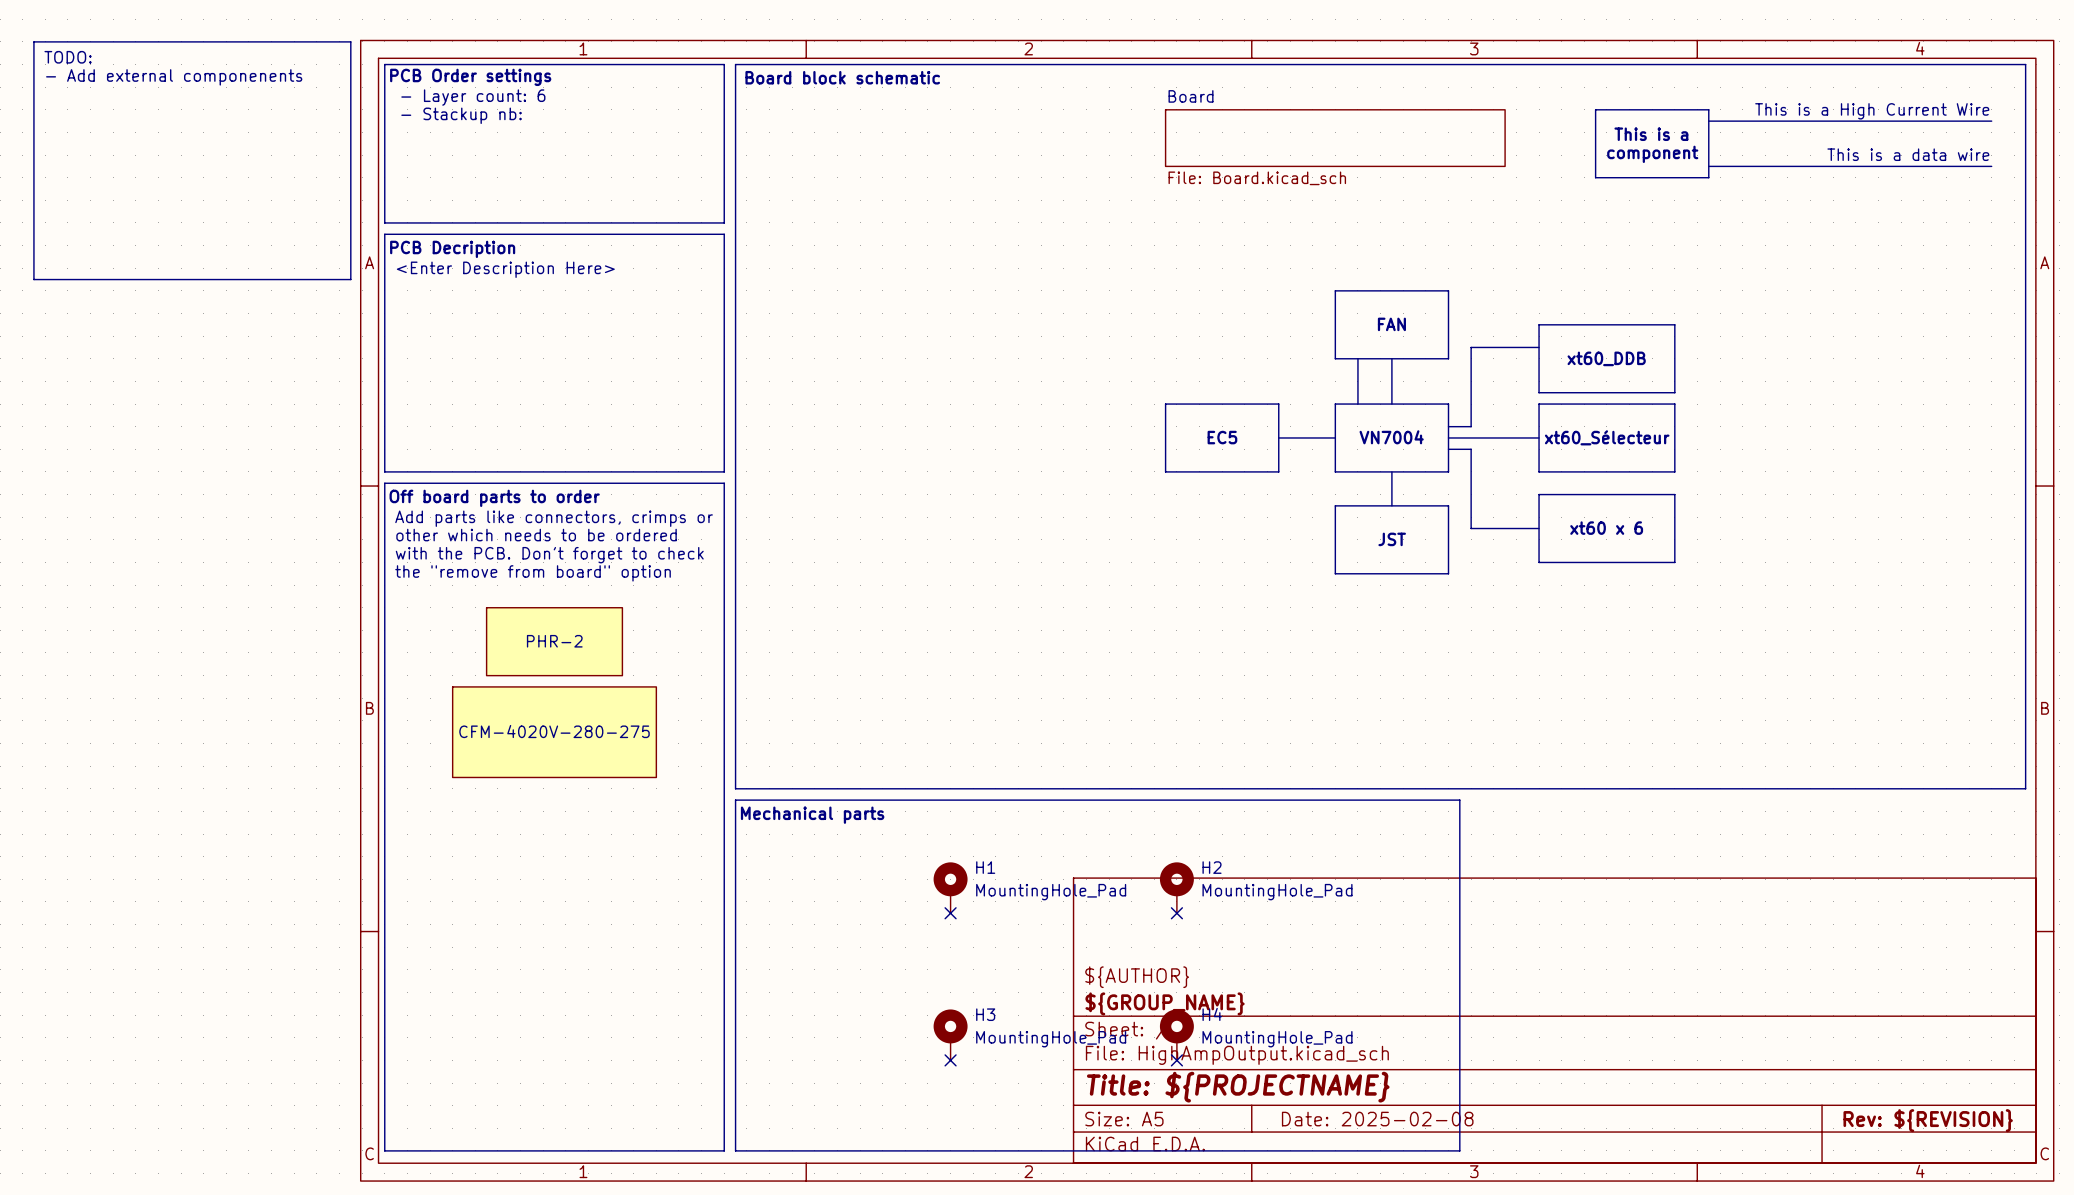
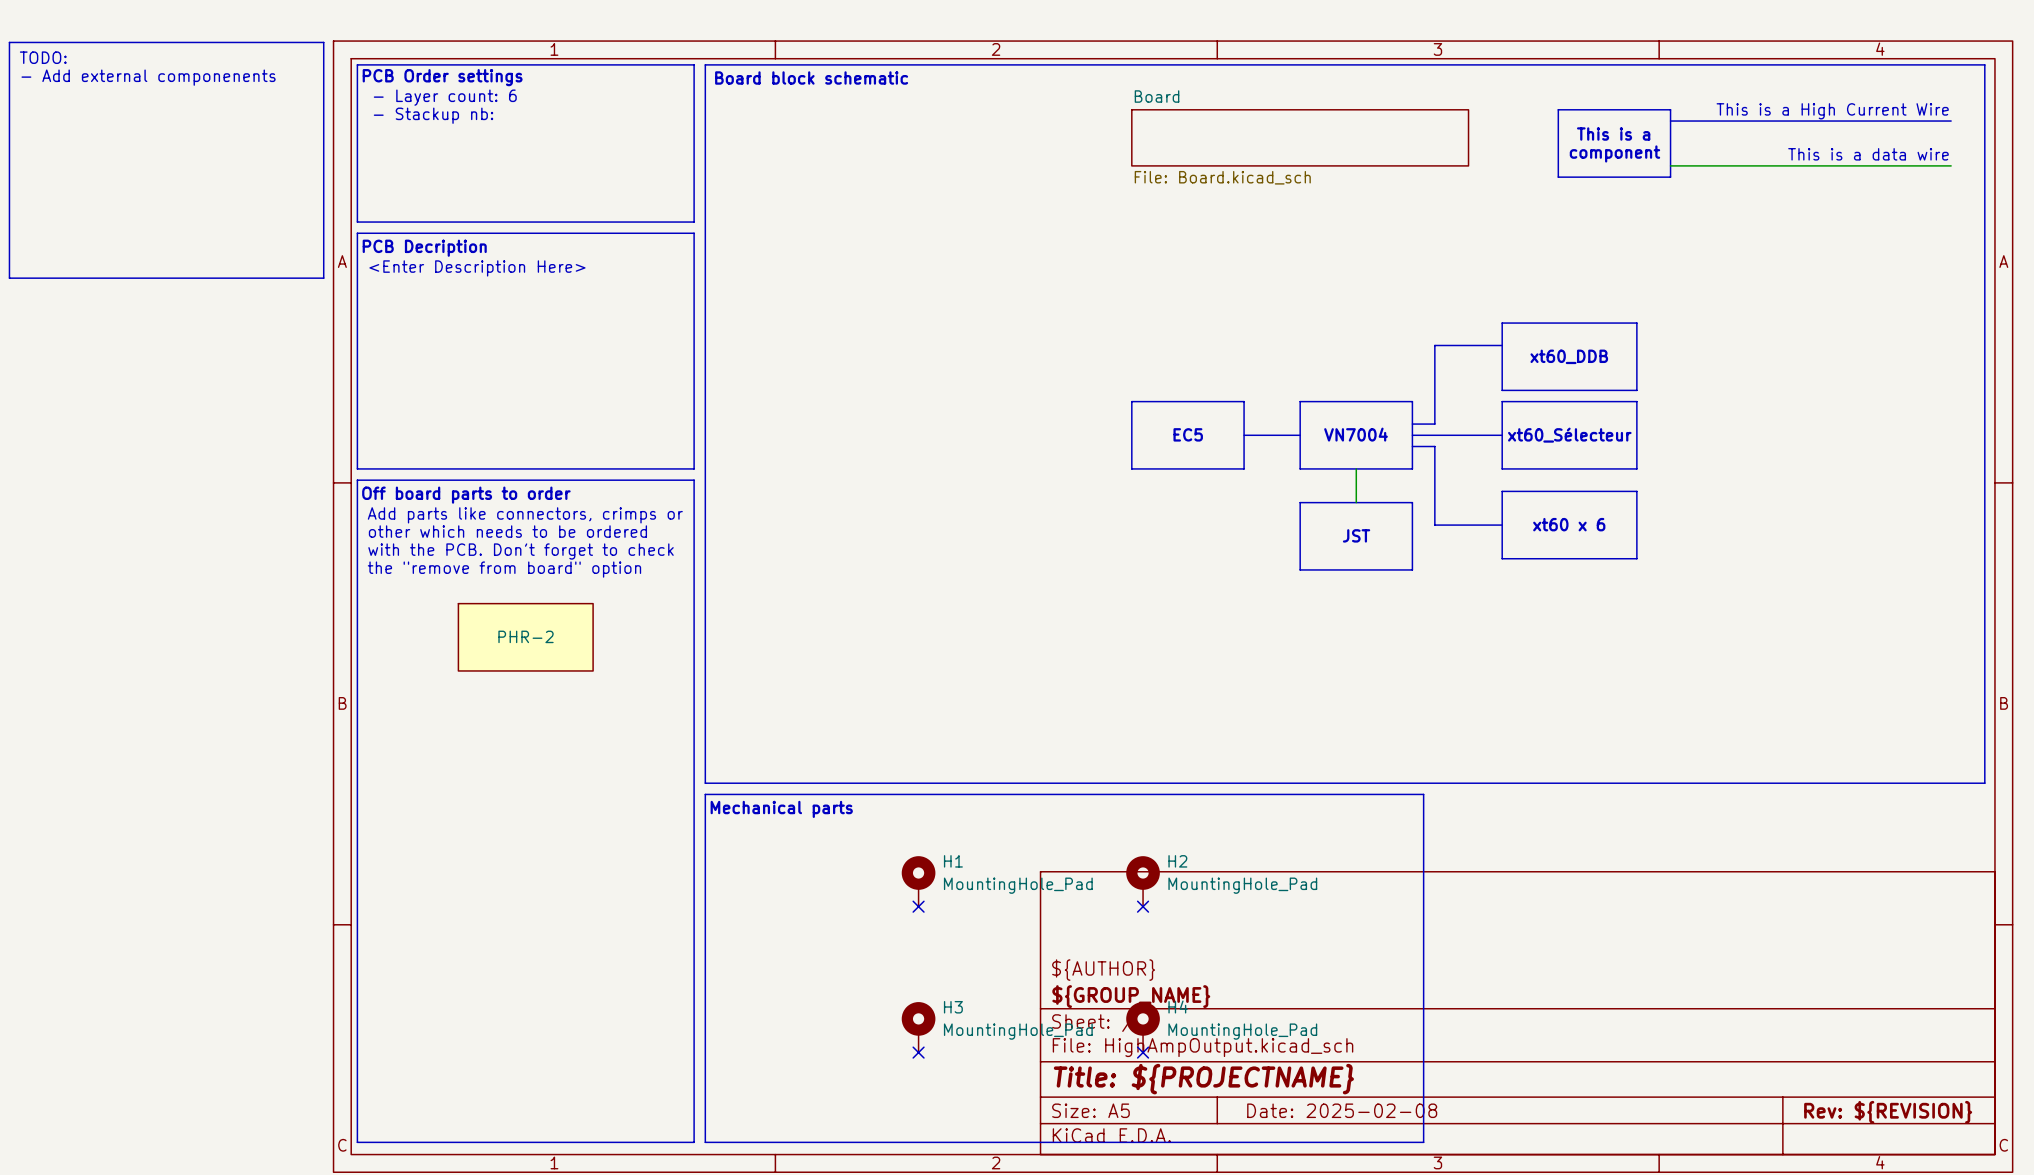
line: (1335, 290) (1448, 290) (1448, 358) (1335, 358) (1335, 290) -> none
text: FAN (1391, 324) -> none
wire: (1357, 358) (1357, 404) -> none
bus: (1391, 358) (1391, 404) -> none
part: CFM-4020V-280-275 (554, 732) -> none

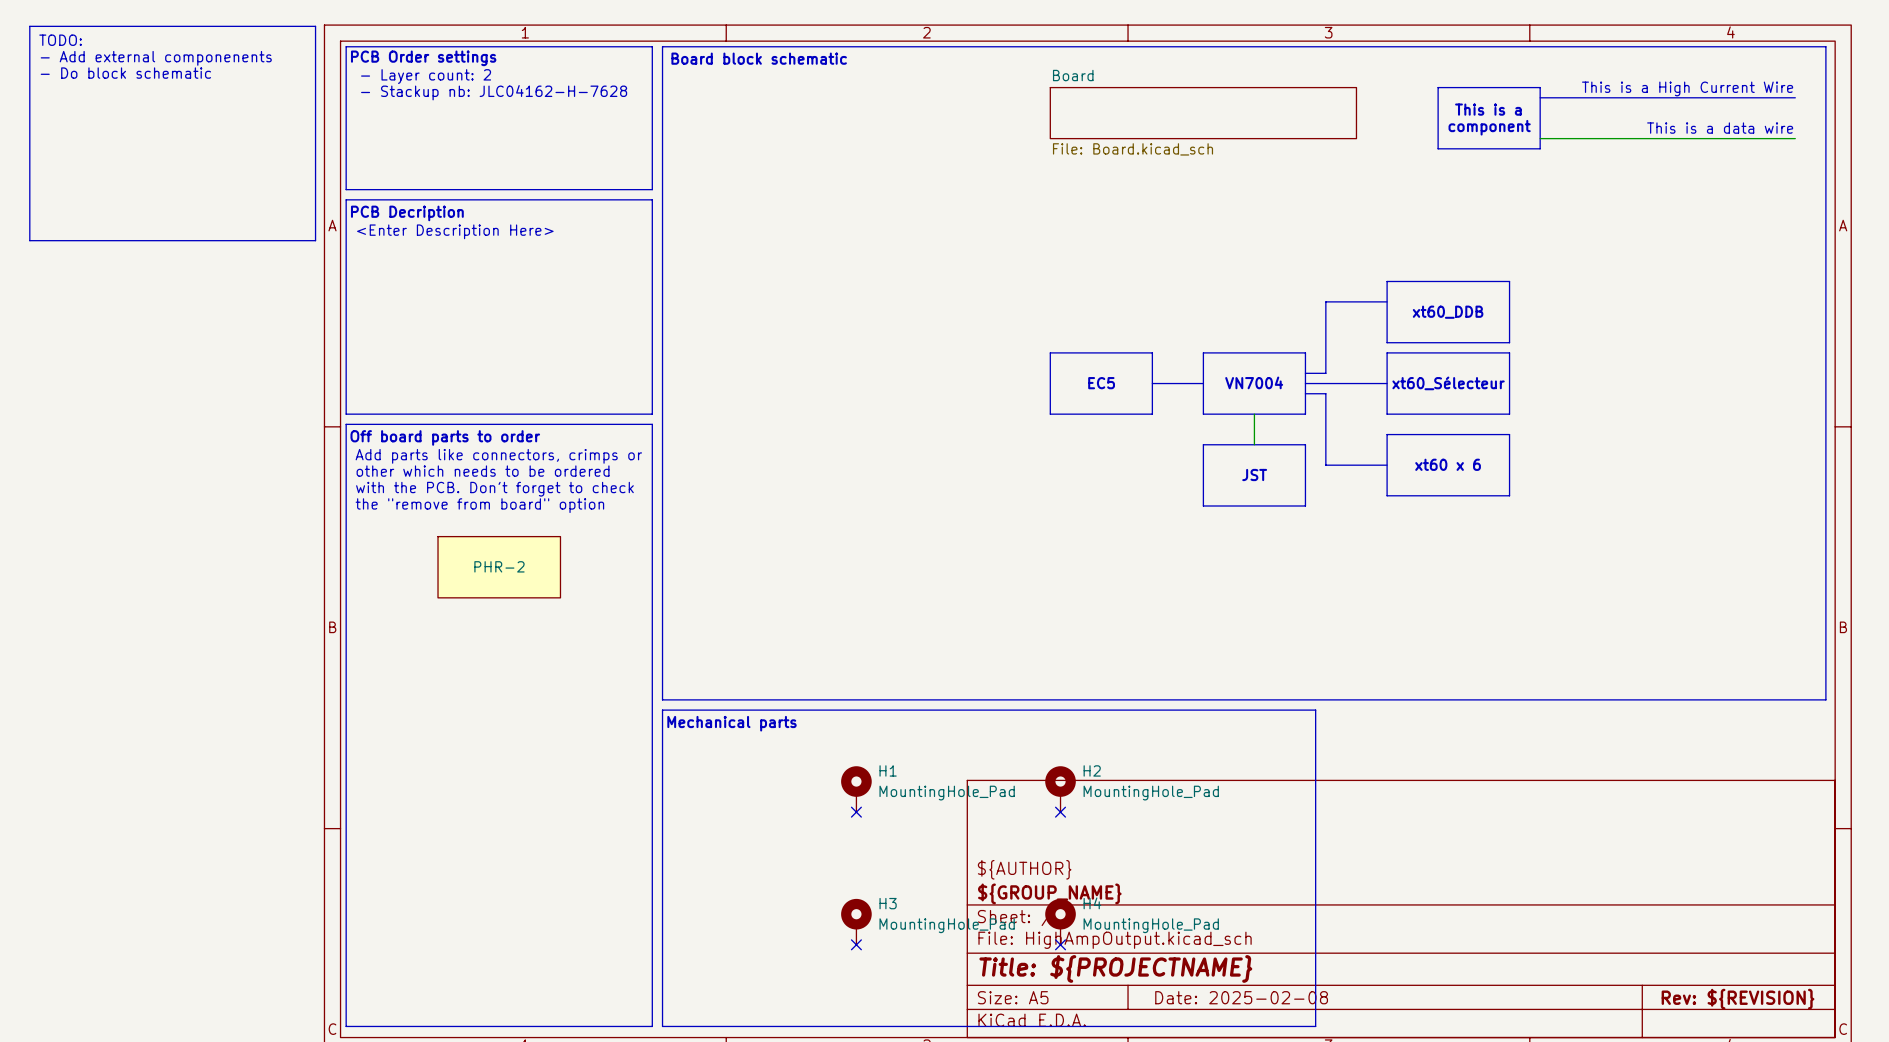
text: none -> - Do block schematic (125, 73)
text: - Layer count: 6 (445, 97) -> - Layer count: 2 (426, 76)
text: - Stackup nb: (433, 115) -> - Stackup nb: JLC04162-H-7628 (494, 92)

